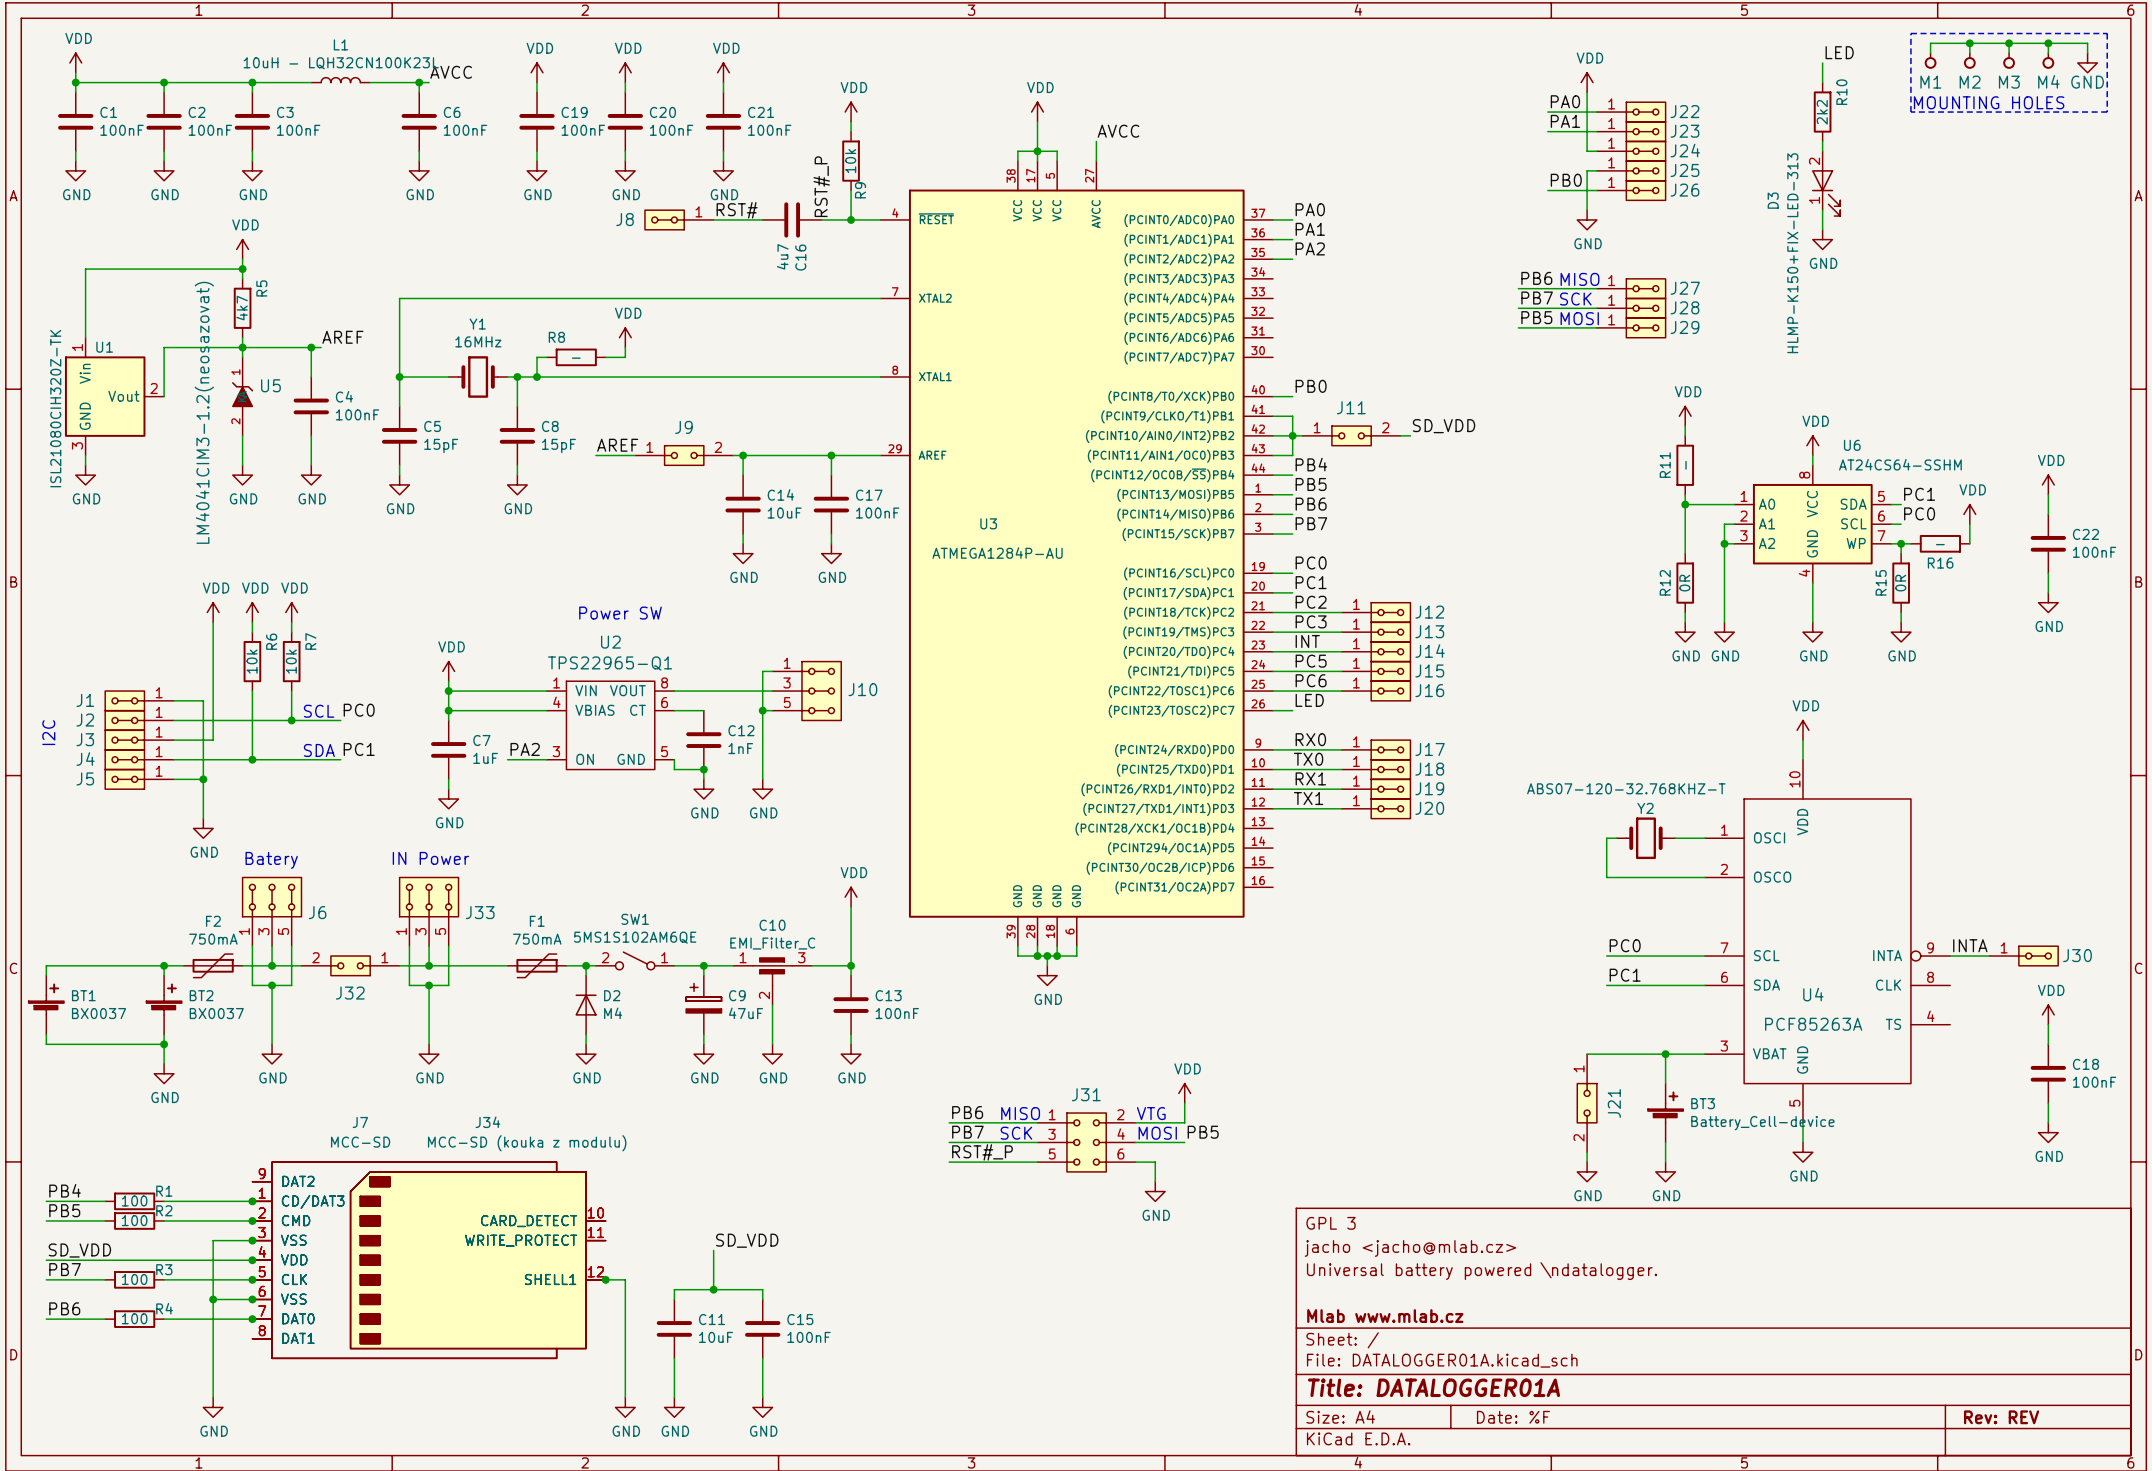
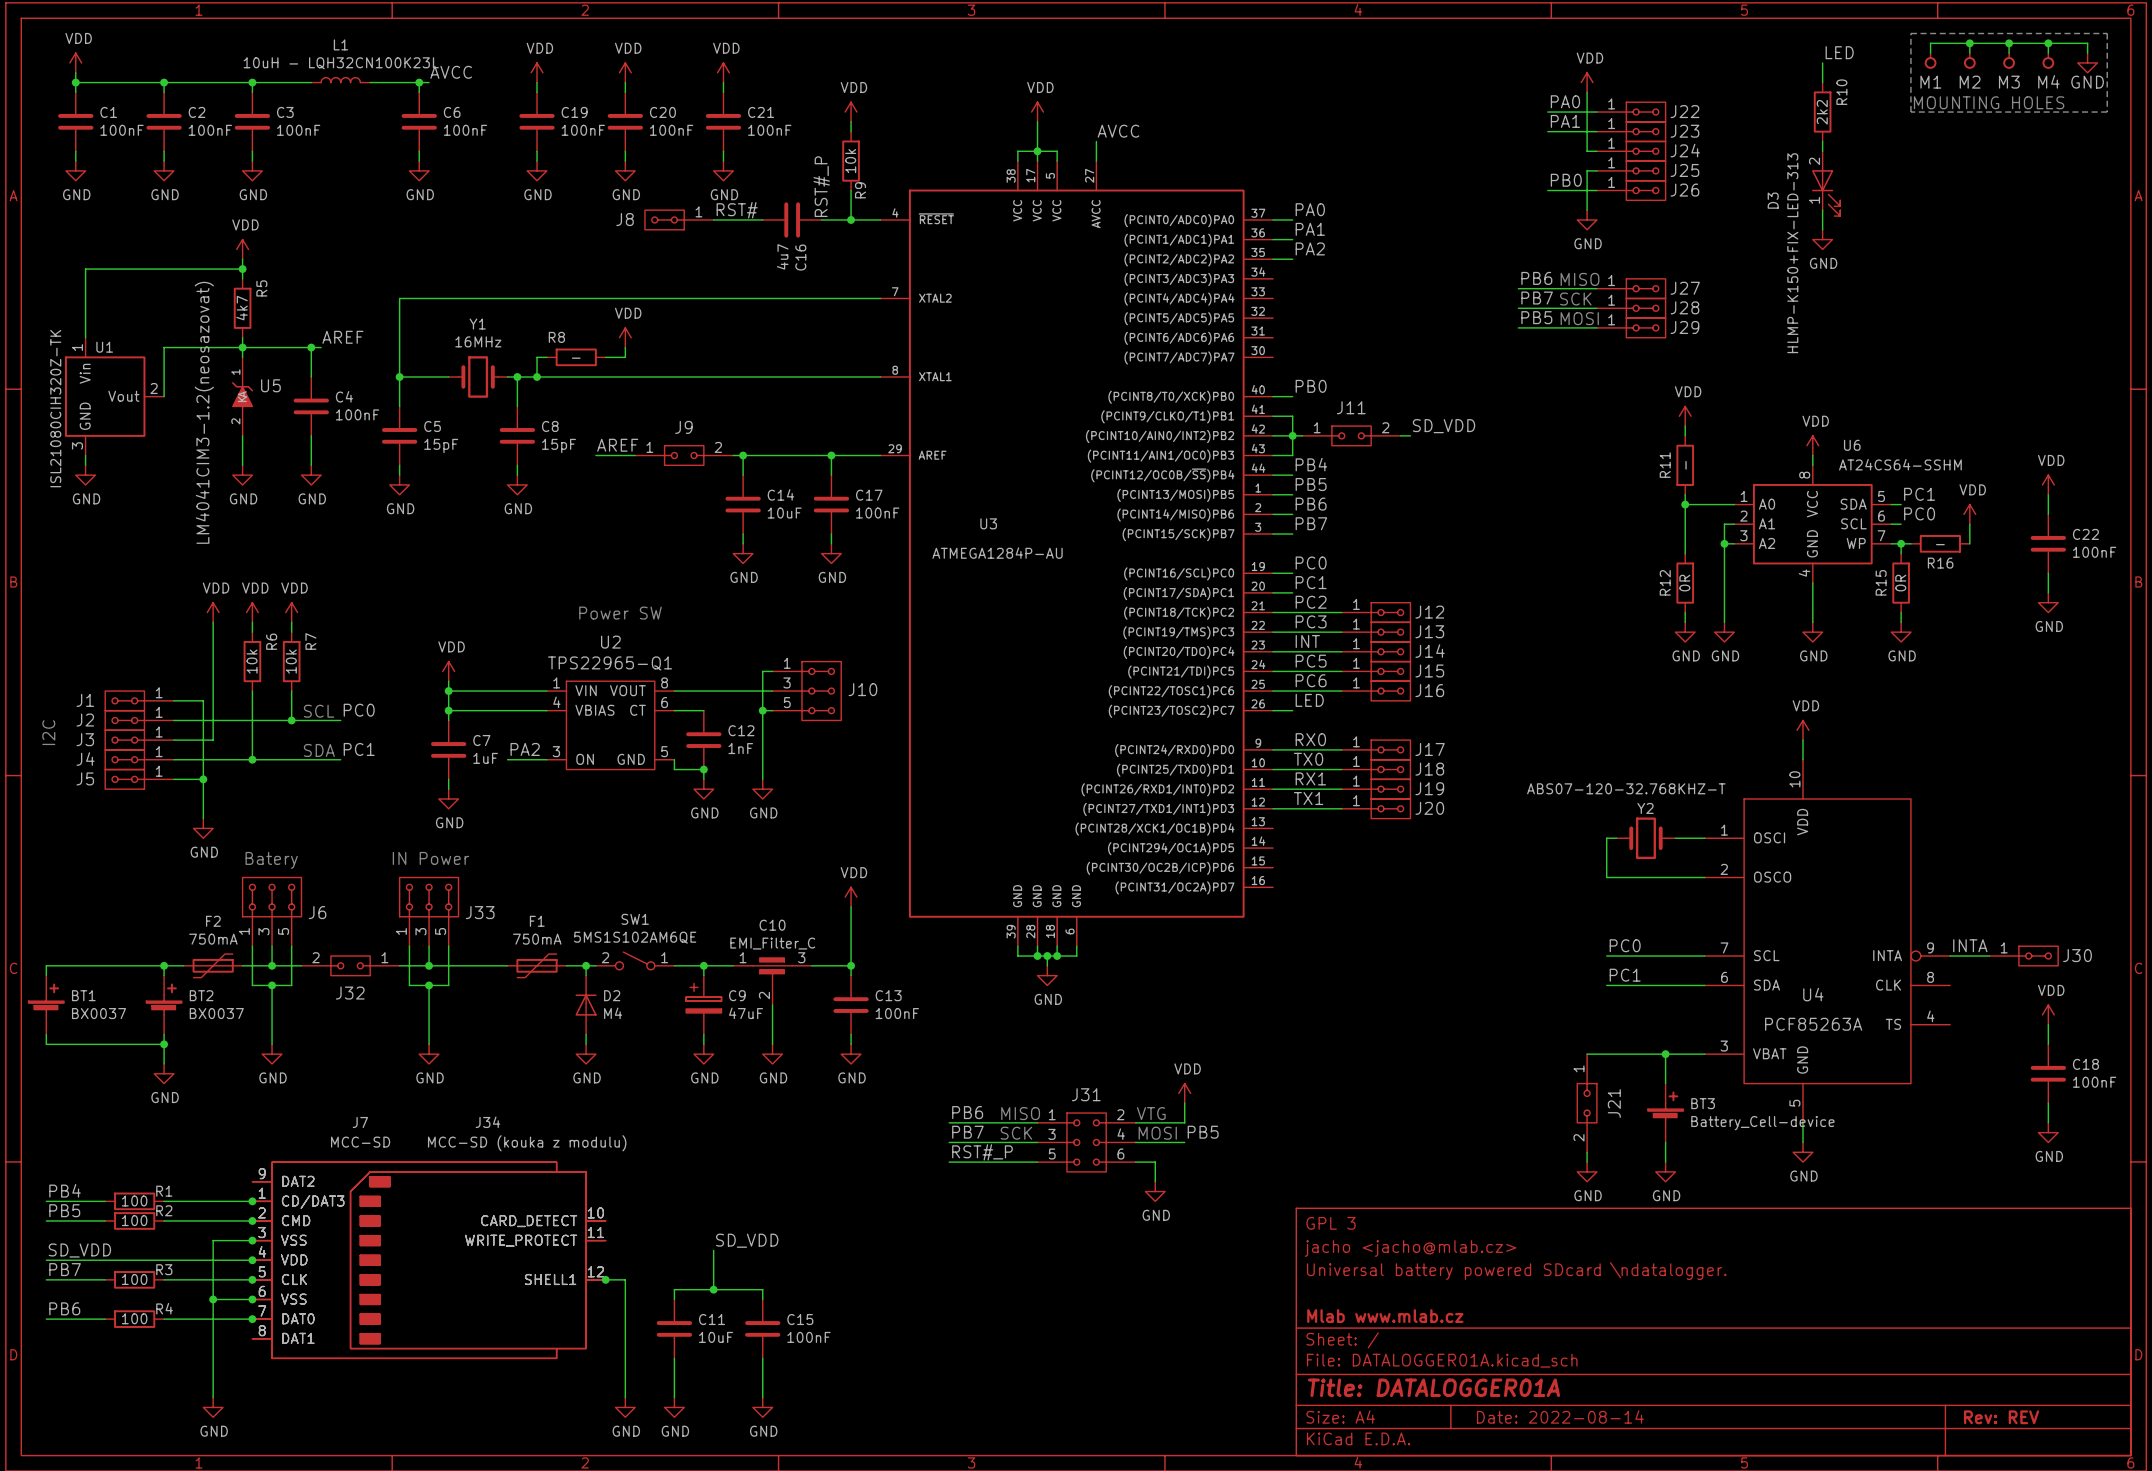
title block: Universal battery powered \ndatalogger. (1481, 1271) -> Universal battery powered SDcard \ndatalogger. (1516, 1271)
title block: Date: %F (1513, 1417) -> Date: 2022-08-14 (1560, 1417)

